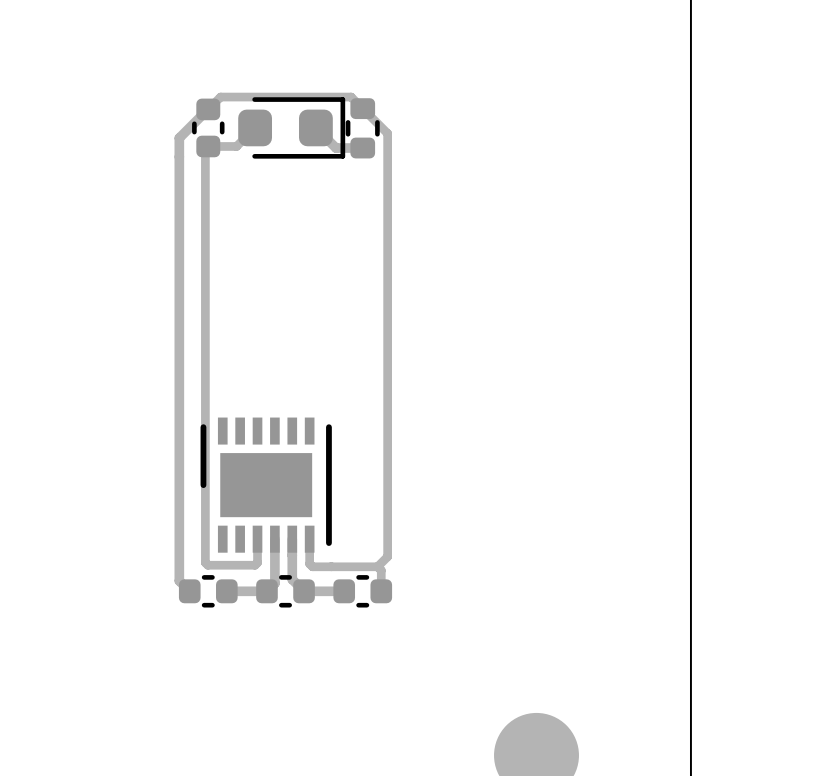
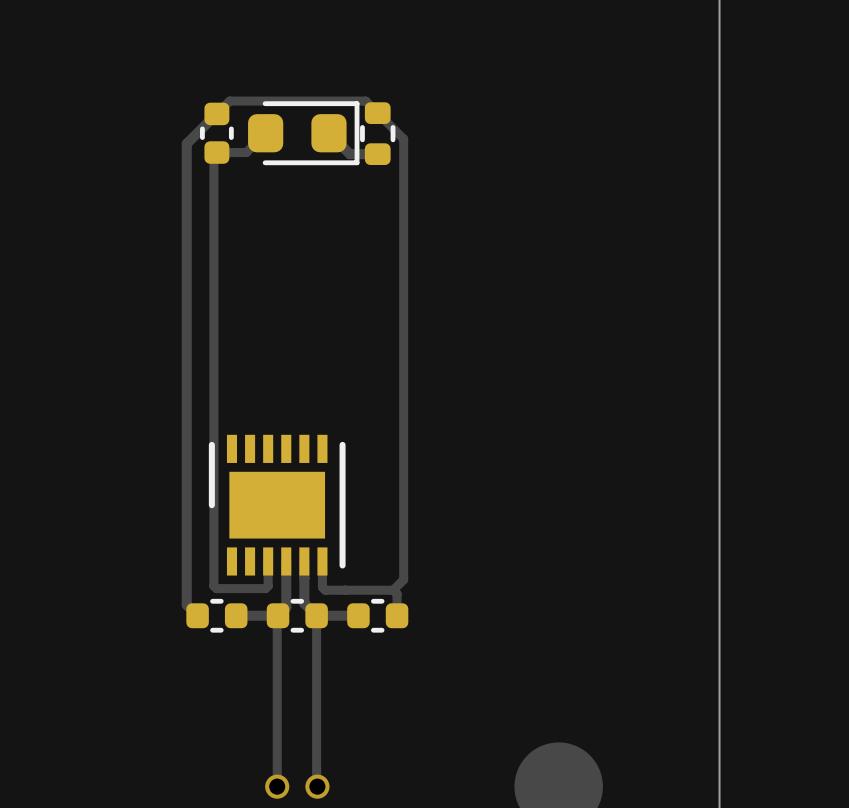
track: none -> (278, 615) (277, 786)
track: none -> (317, 616) (317, 786)
via: none -> (277, 786)
via: none -> (317, 786)

